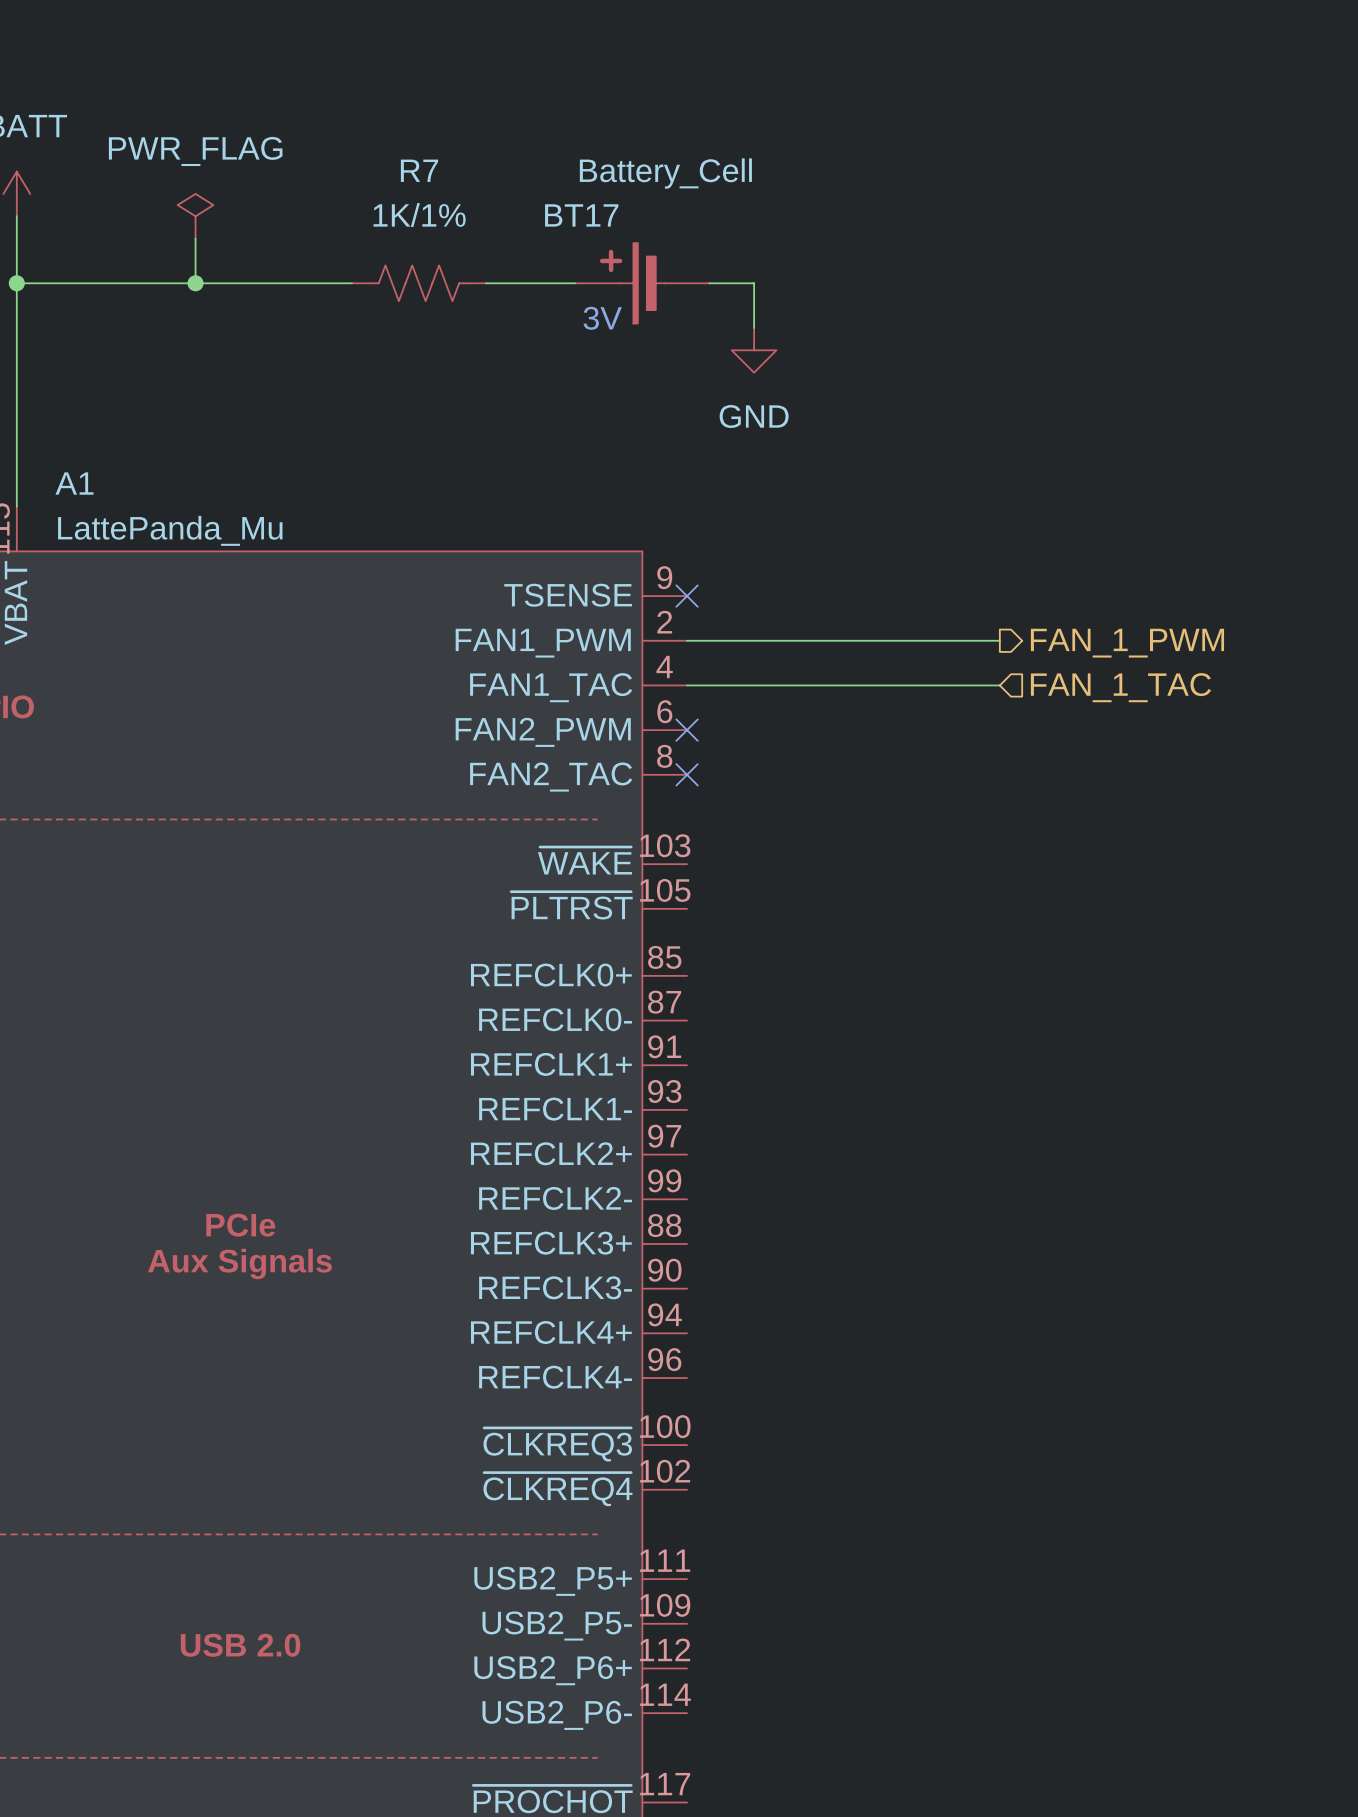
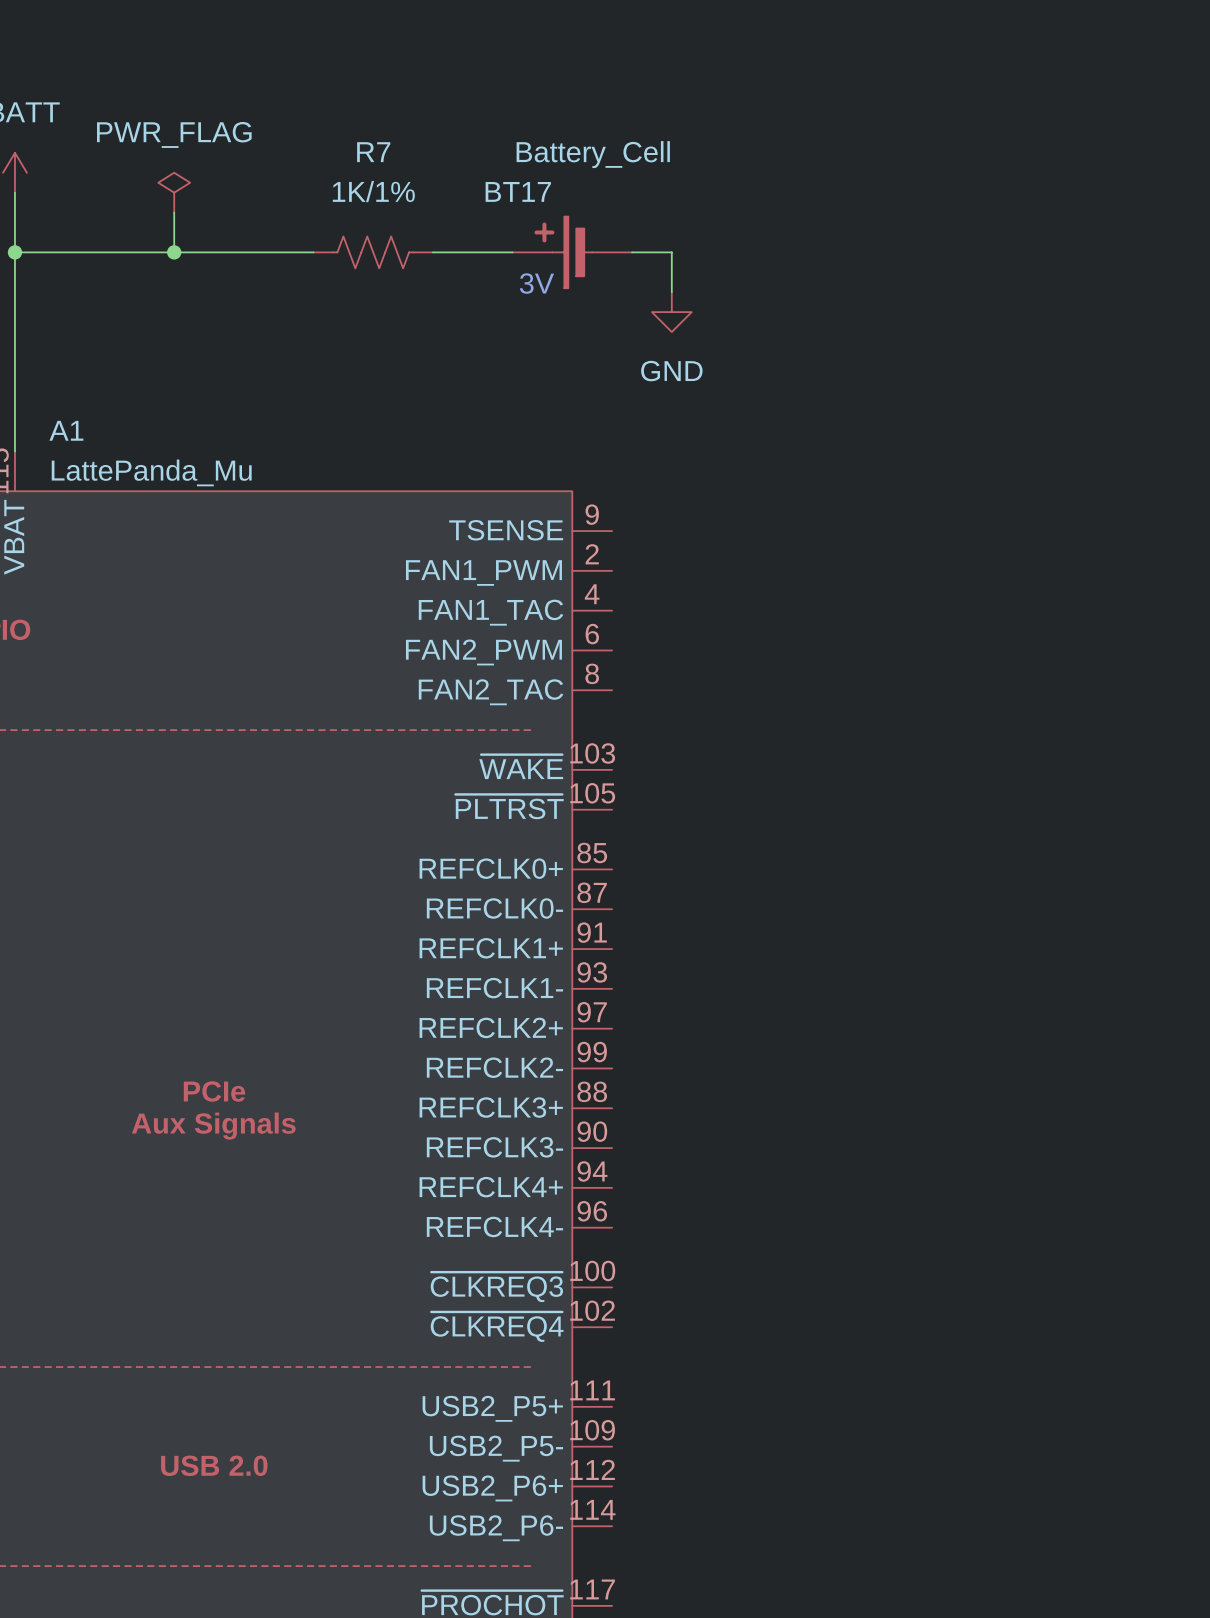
no-connect mark: (687, 596) -> none
wire: (687, 640) (999, 640) -> none
hierarchical label: FAN_1_PWM (1127, 643) -> none
wire: (687, 685) (999, 685) -> none
hierarchical label: FAN_1_TAC (1120, 687) -> none
no-connect mark: (687, 730) -> none
no-connect mark: (687, 774) -> none

